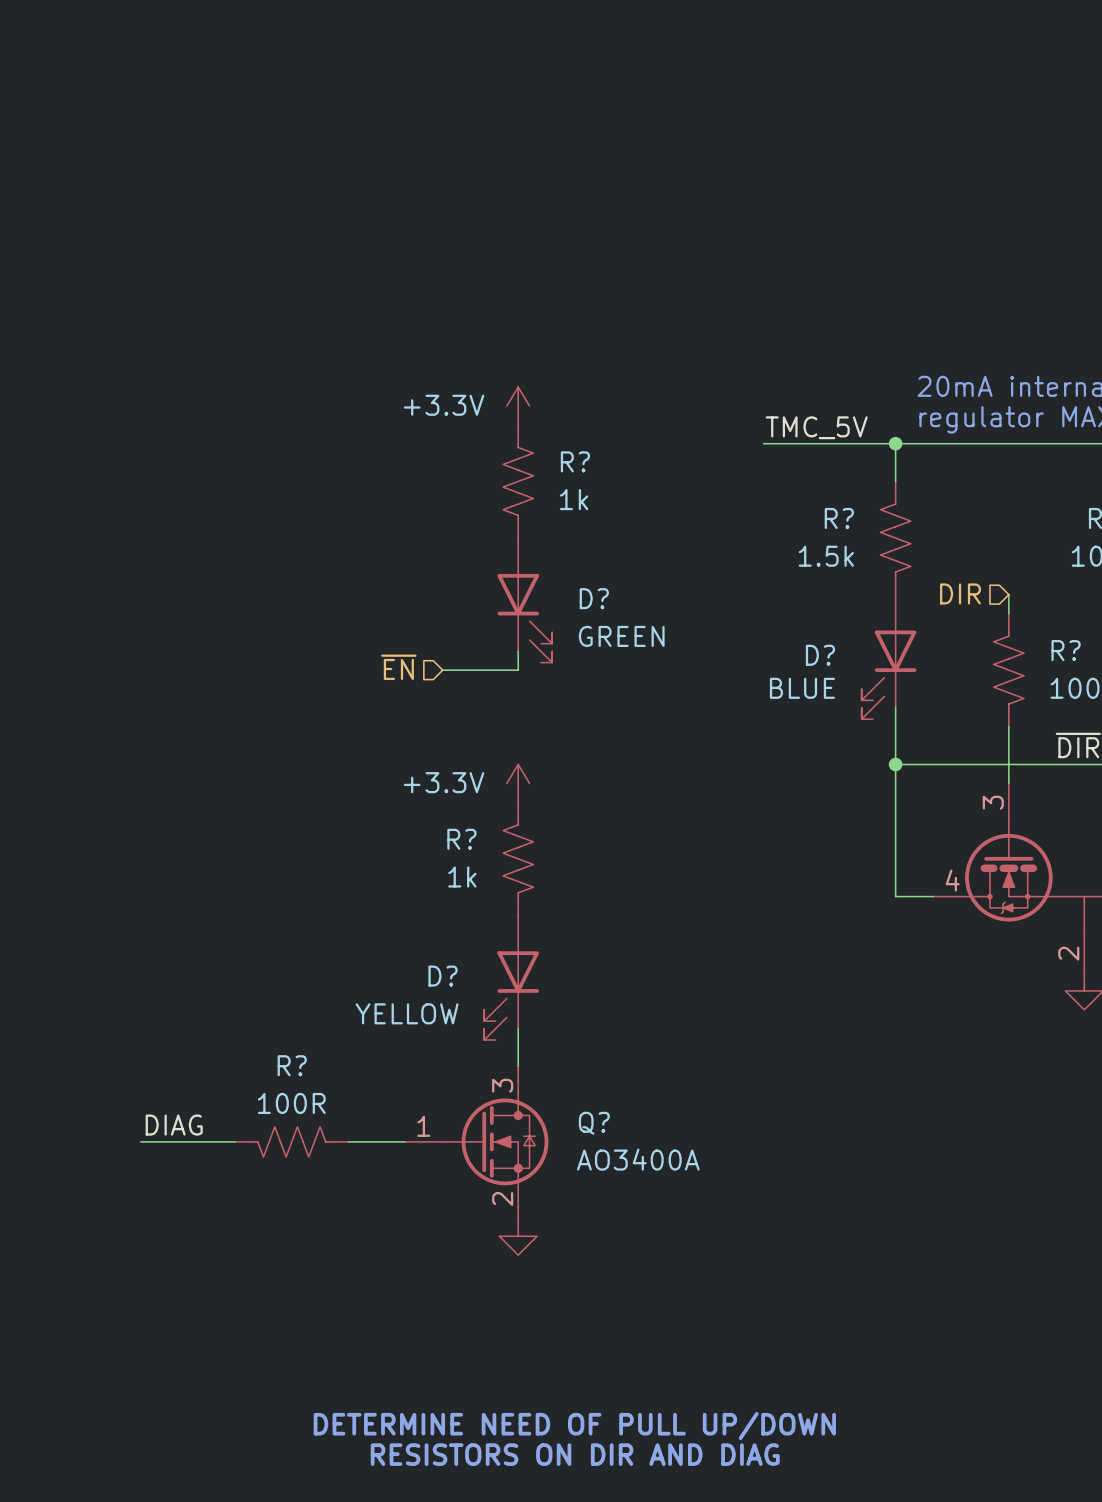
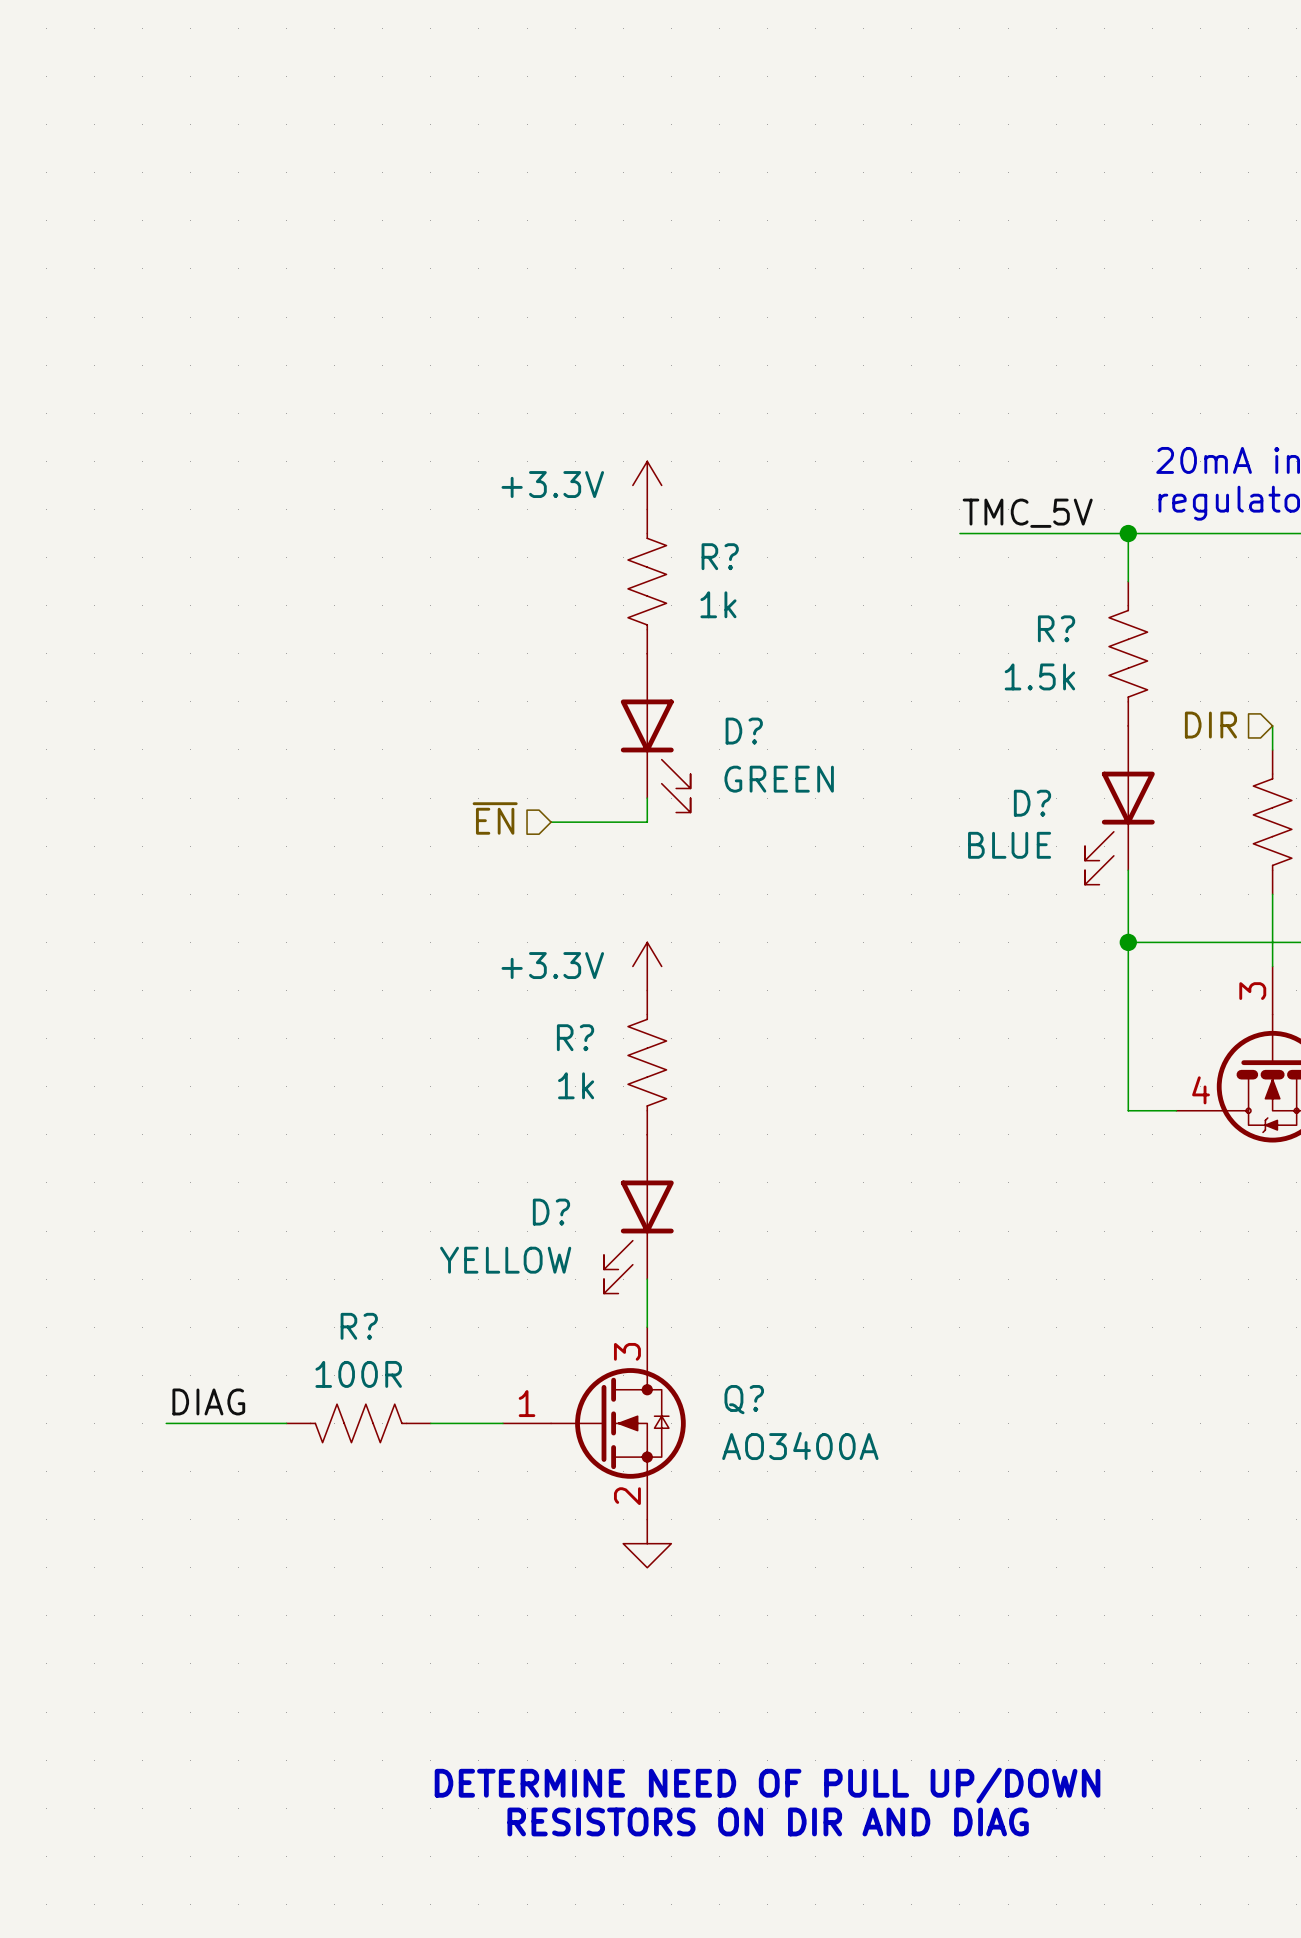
text position: DETERMINE NEED OF PULL UP/DOWN (574, 1426) -> DETERMINE NEED OF PULL UP/DOWN (767, 1785)
text position: RESISTORS ON DIR AND DIAG (575, 1454) -> RESISTORS ON DIR AND DIAG (768, 1821)

